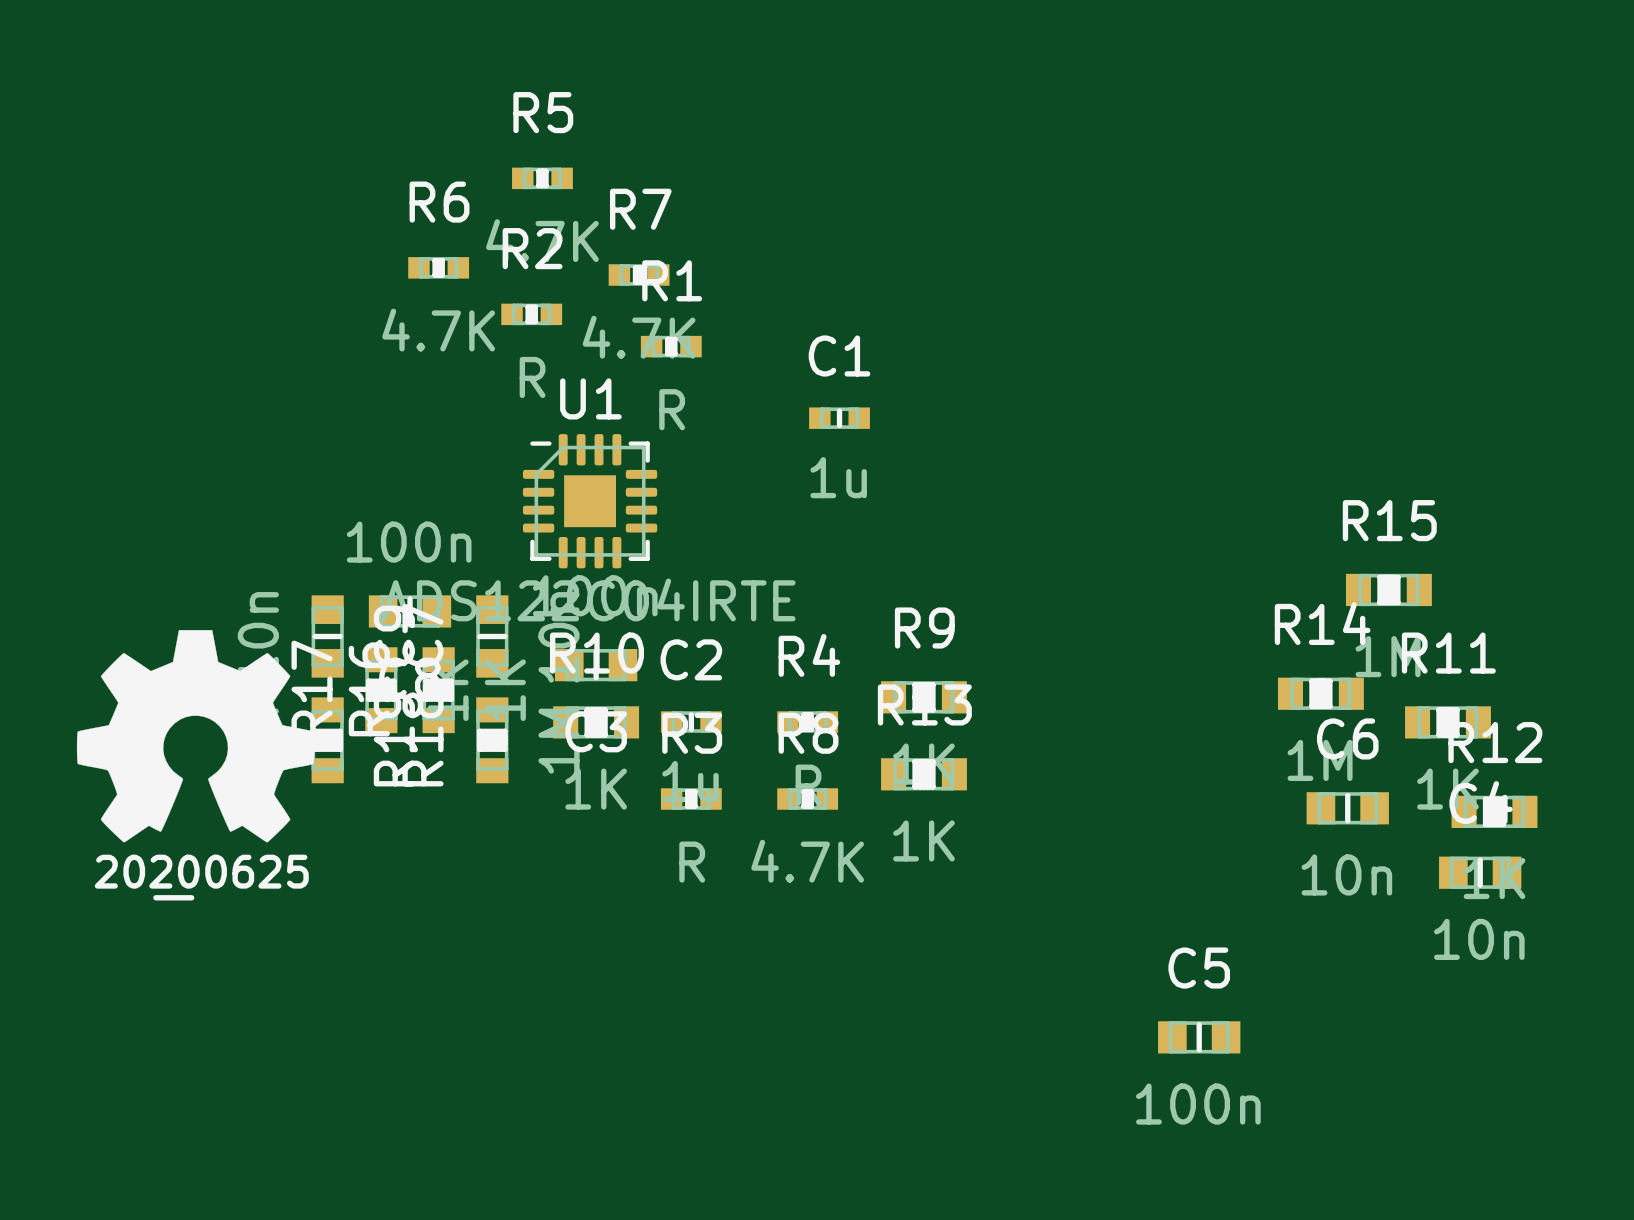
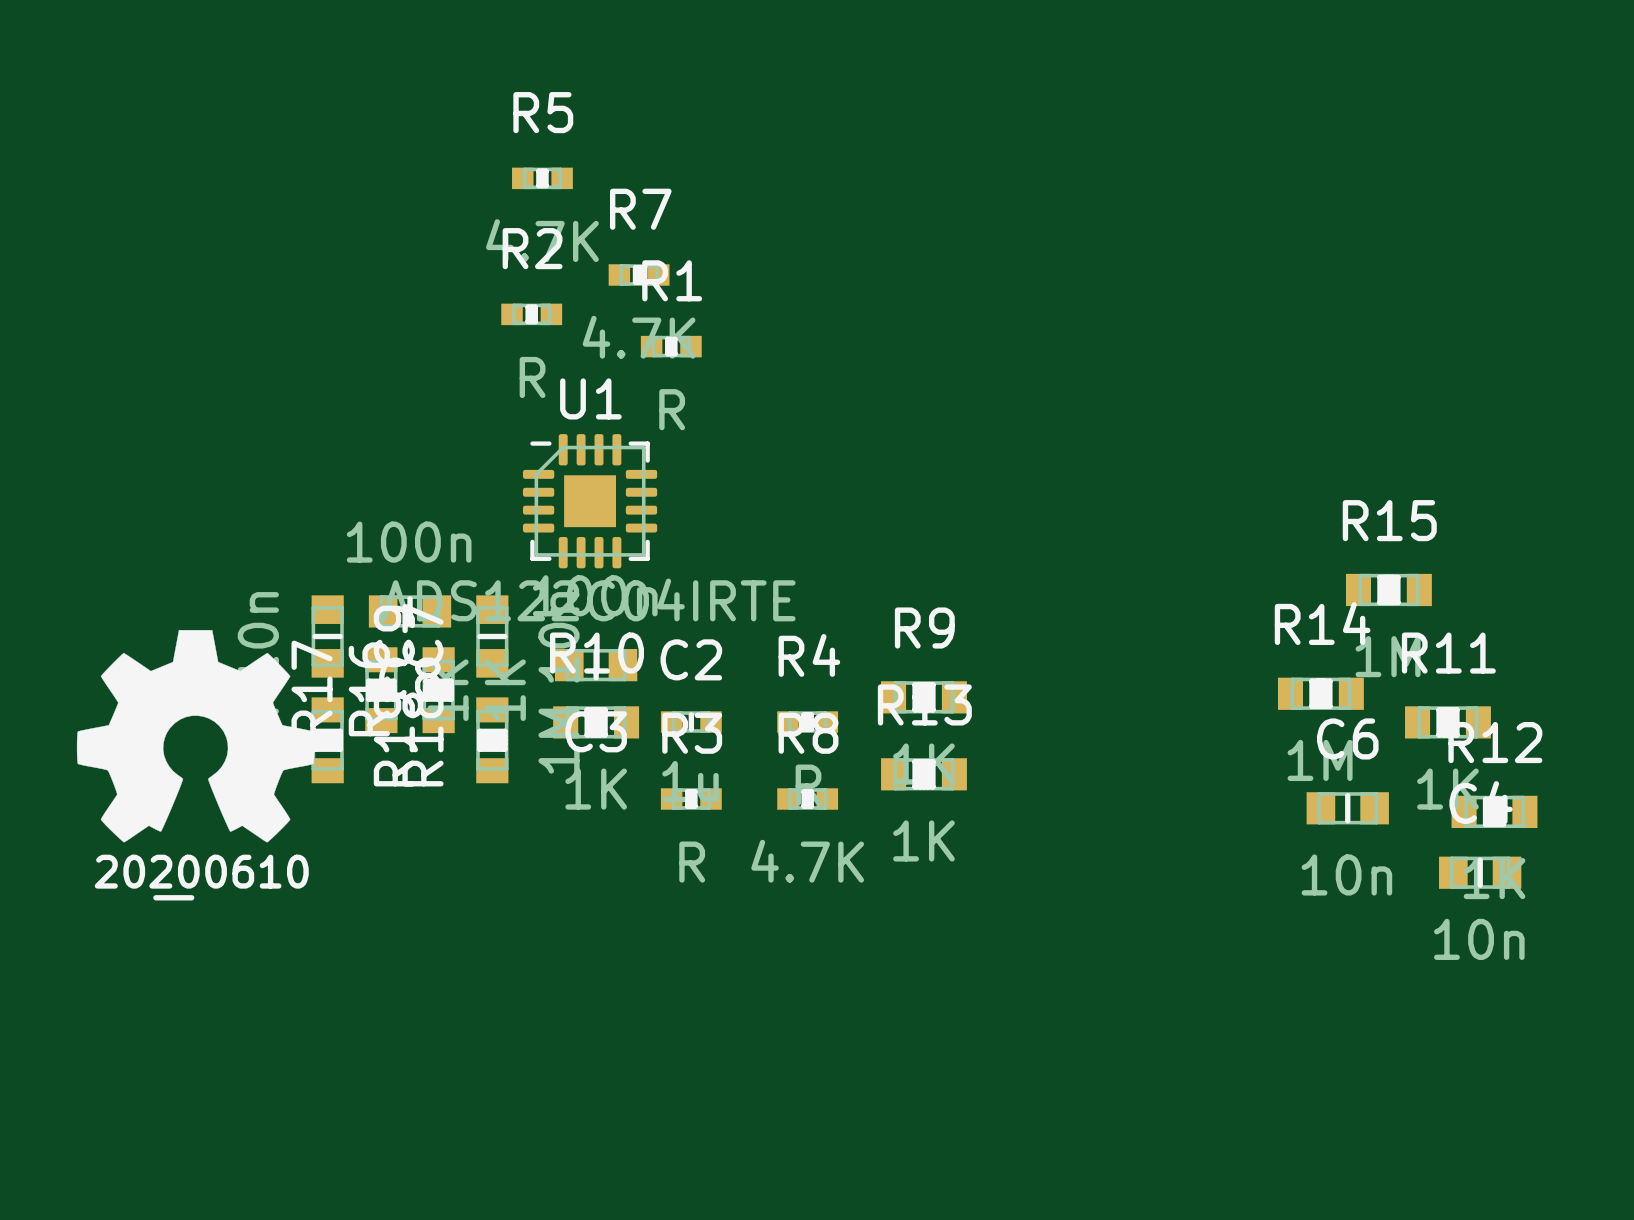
R6: 4.7K (438, 267) -> none
C1: 1u (839, 418) -> none
drawing shape: [94, 854, 309, 901] -> [94, 854, 309, 901]
C5: 100n (1199, 1037) -> none

